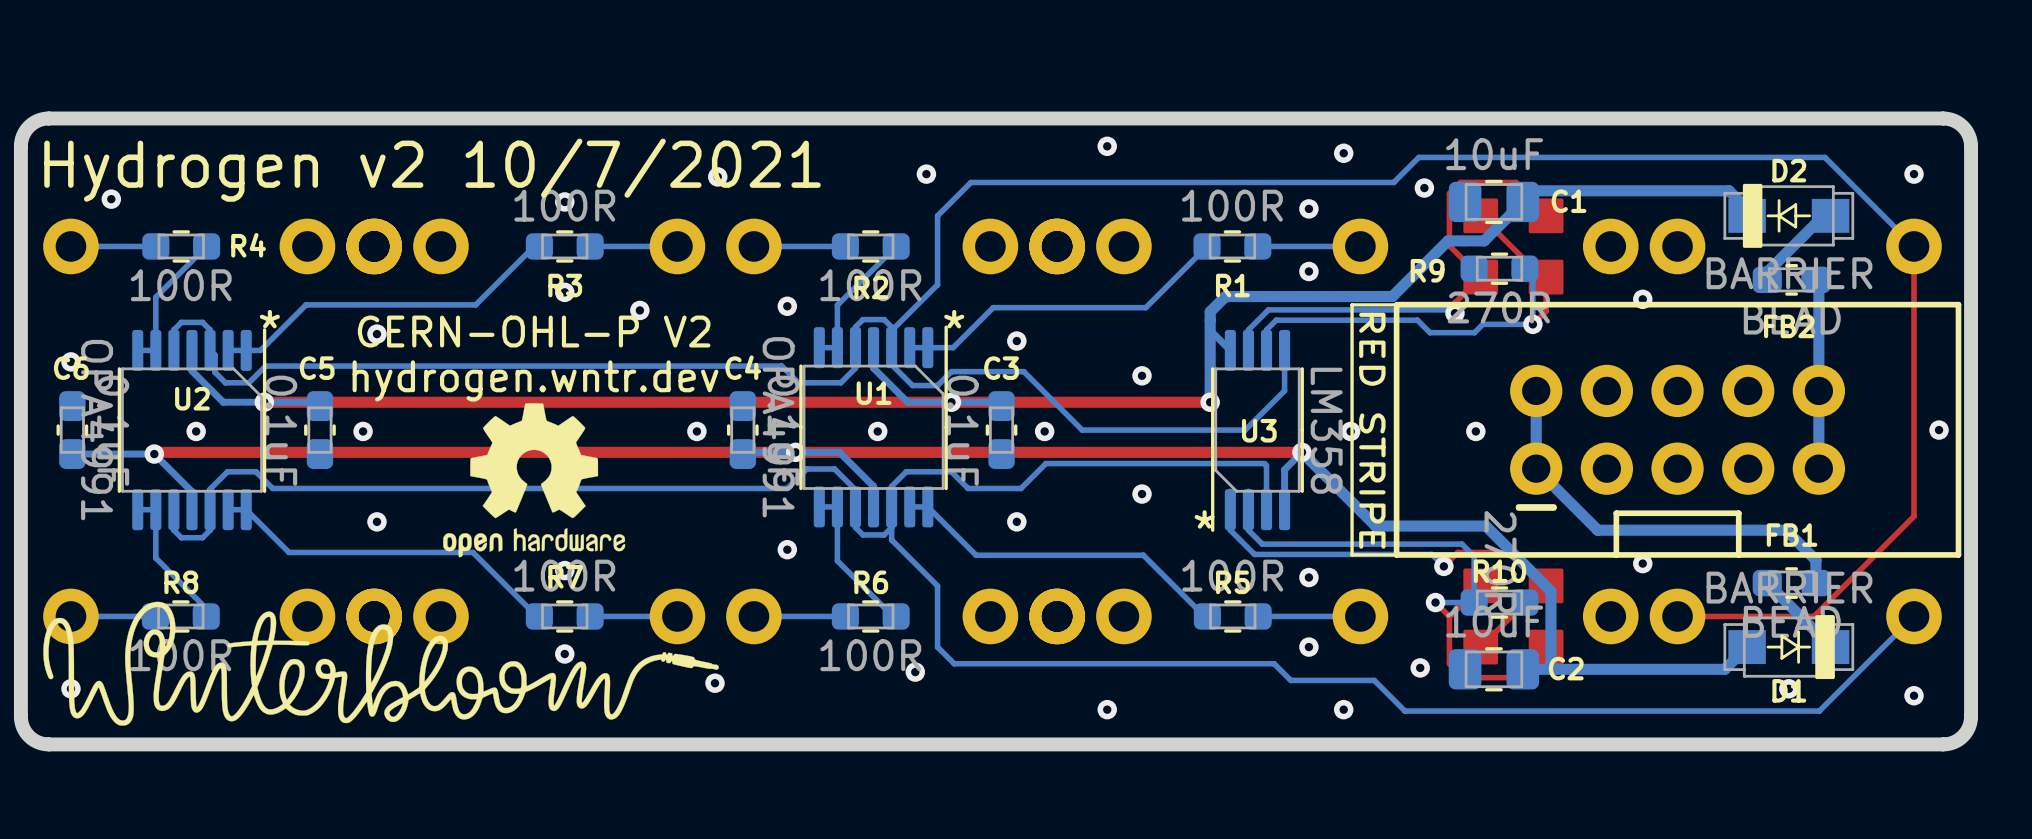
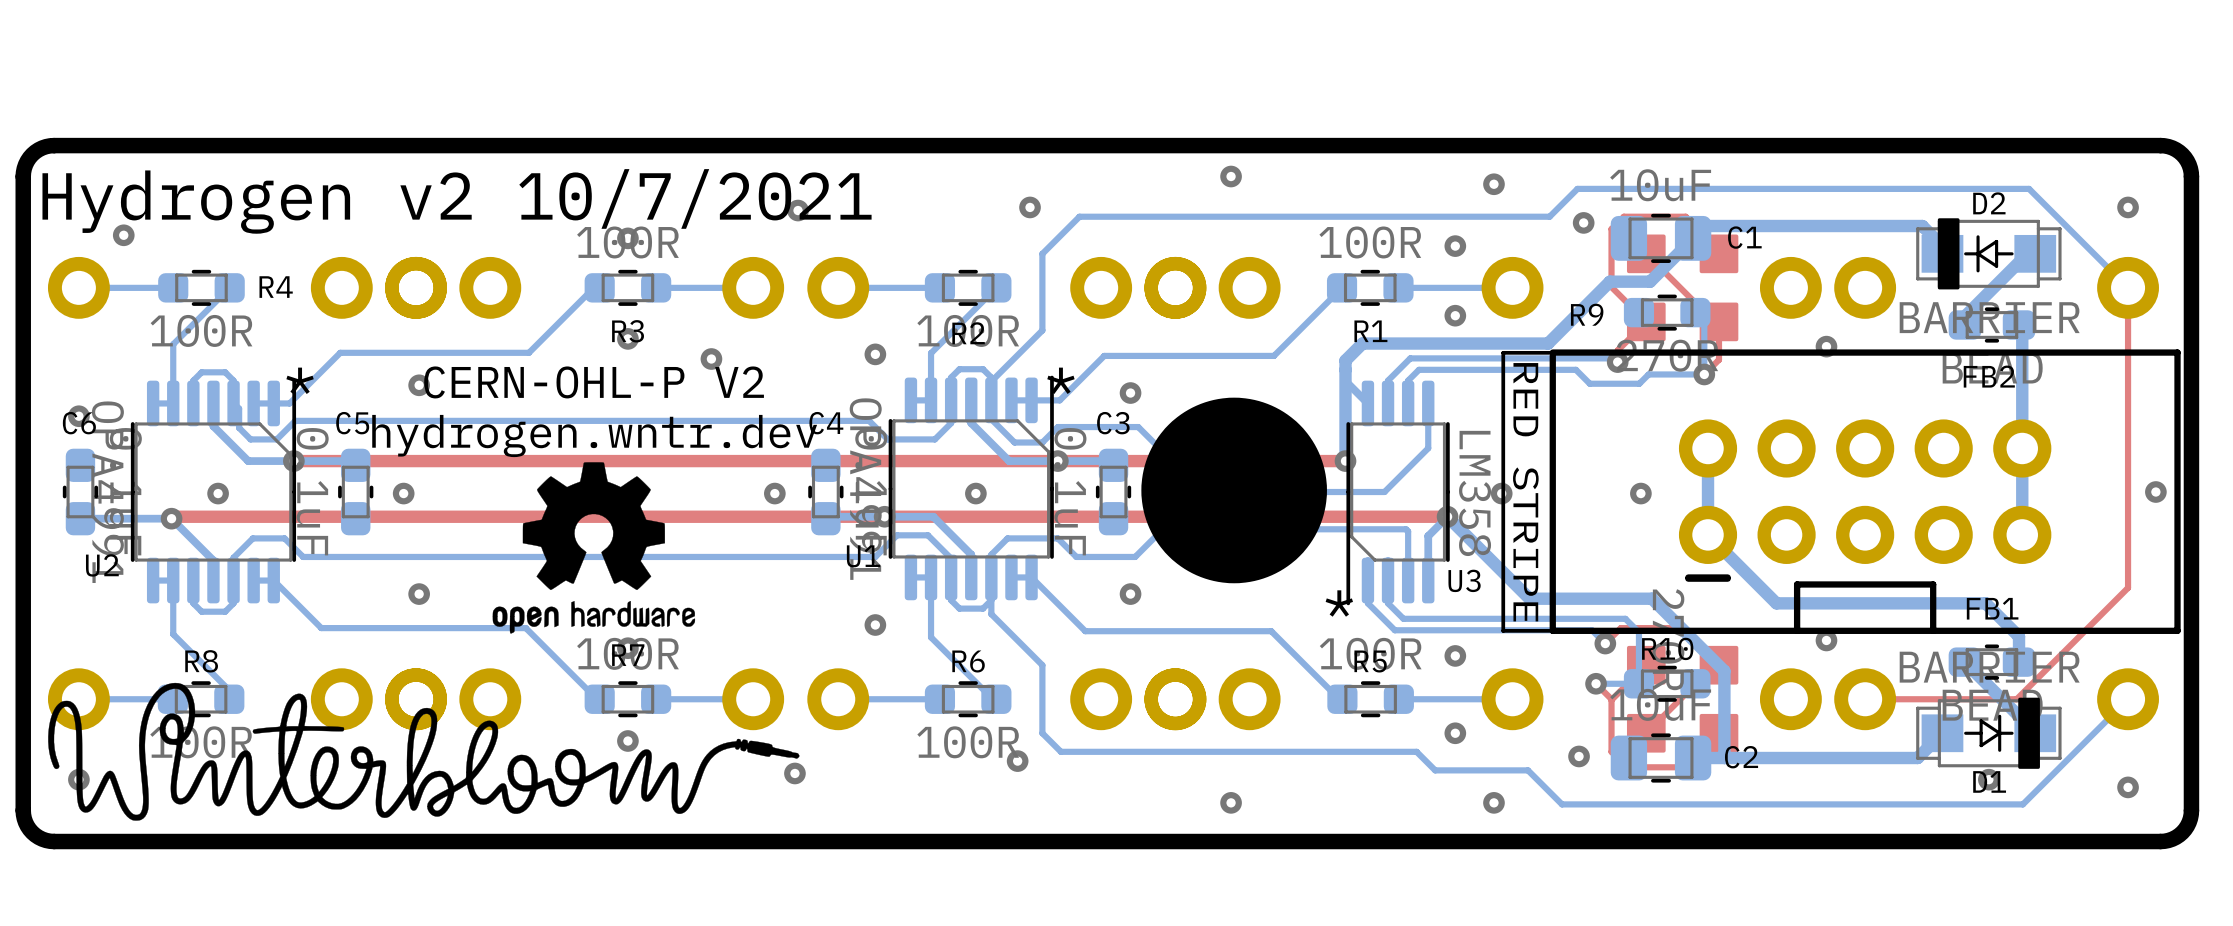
drawing: none -> [1141, 397, 1327, 584]
U1 name position: U1 (874, 393) -> U1 (863, 556)
U2 name position: U2 (192, 398) -> U2 (102, 565)
U3 name position: U3 (1259, 430) -> U3 (1464, 580)

